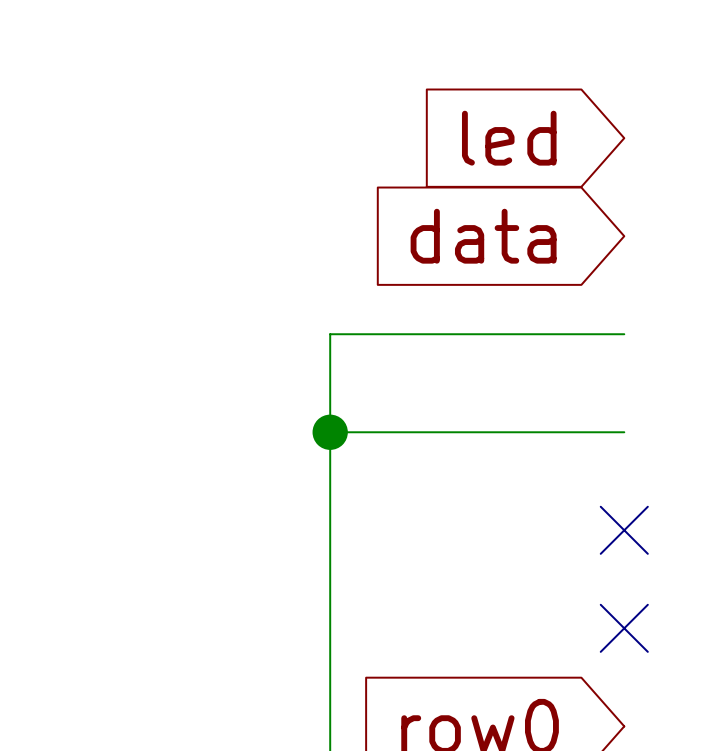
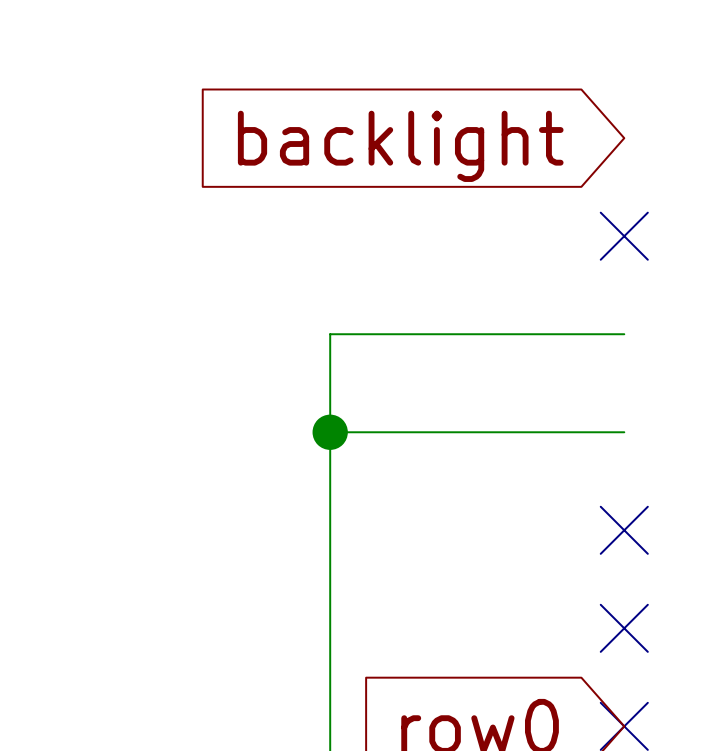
global label: led (509, 138) -> backlight (400, 146)
global label: data (483, 236) -> none
no-connect mark: none -> (624, 236)
no-connect mark: none -> (624, 726)

